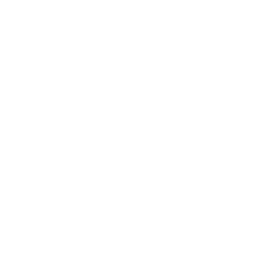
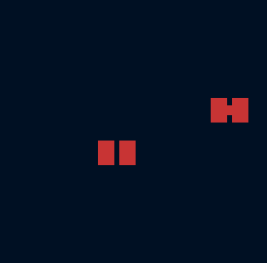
part: none -> (229, 110)
part: none -> (116, 152)

